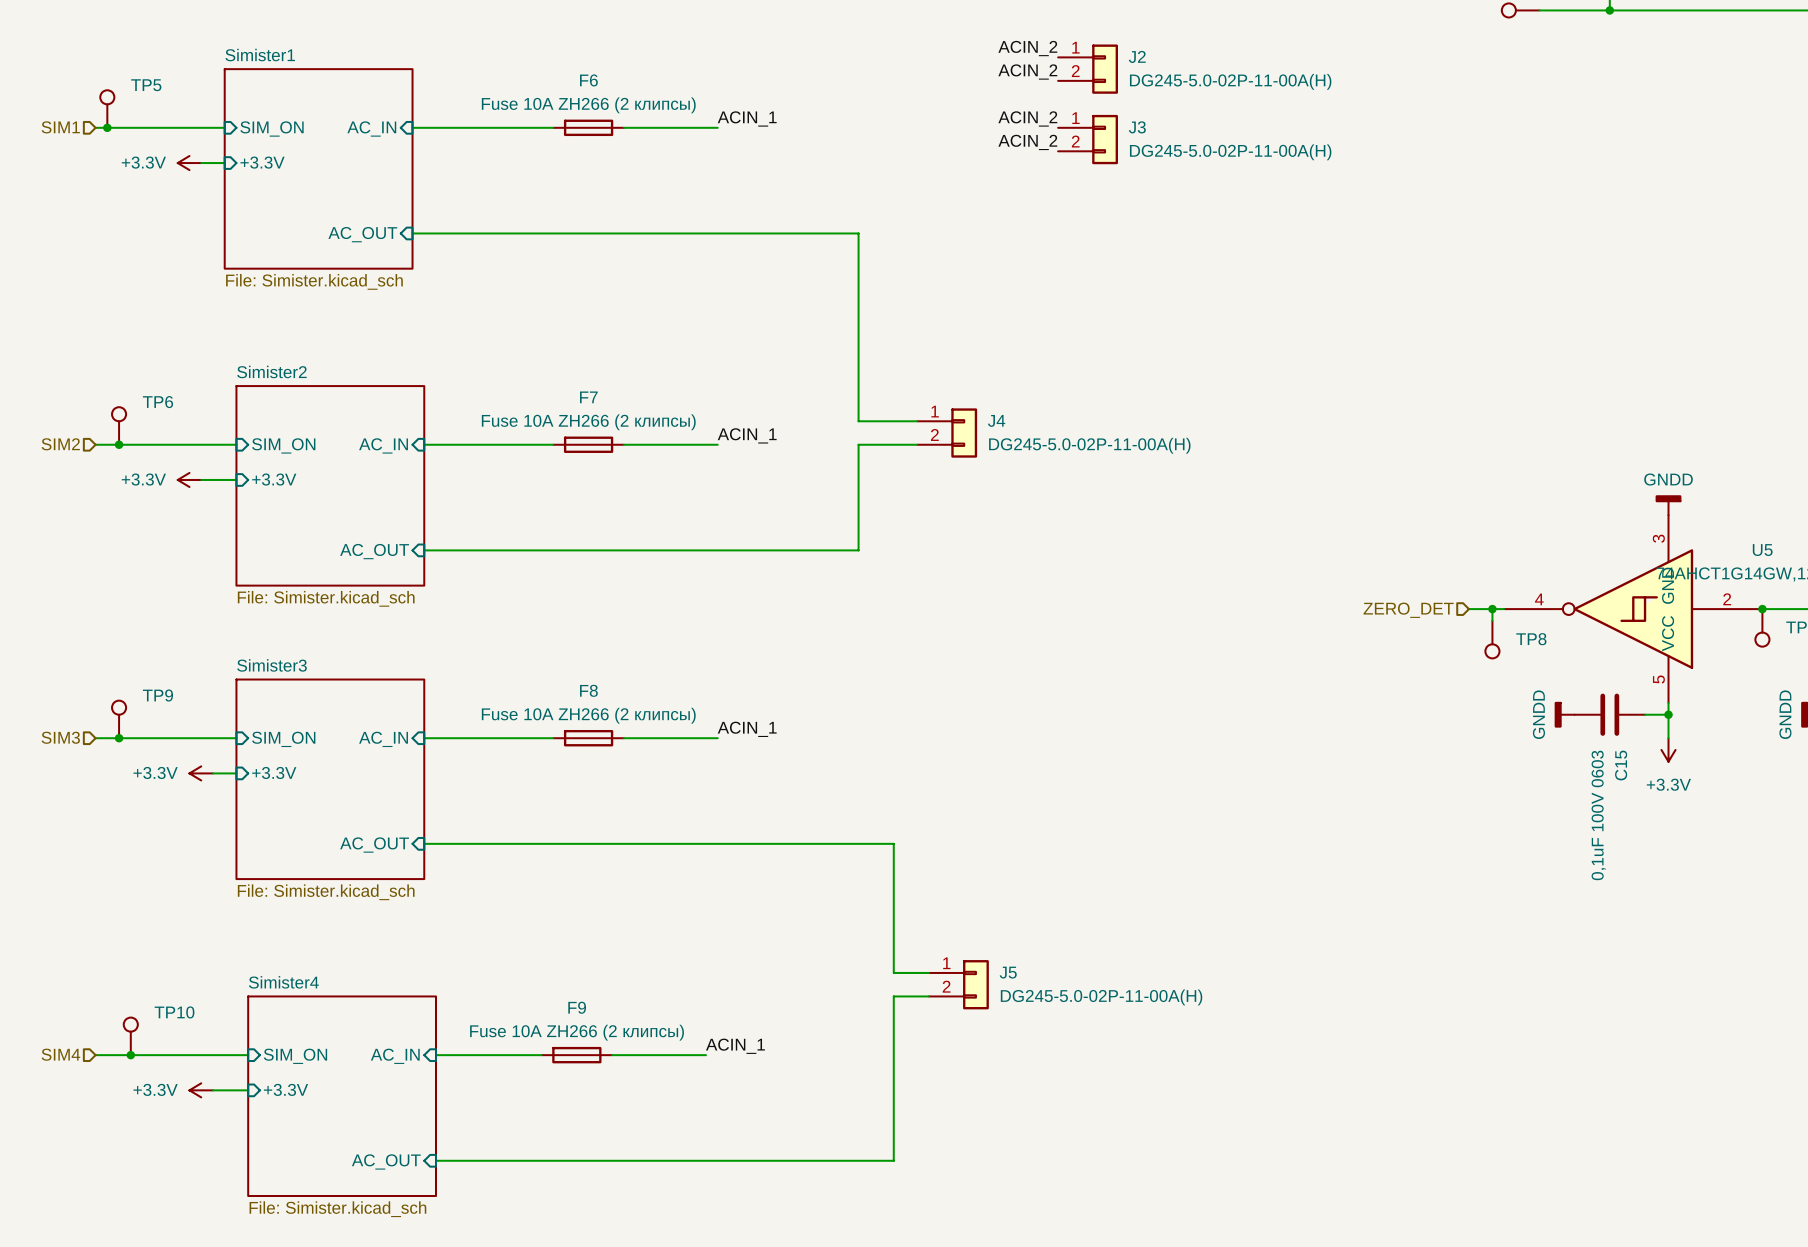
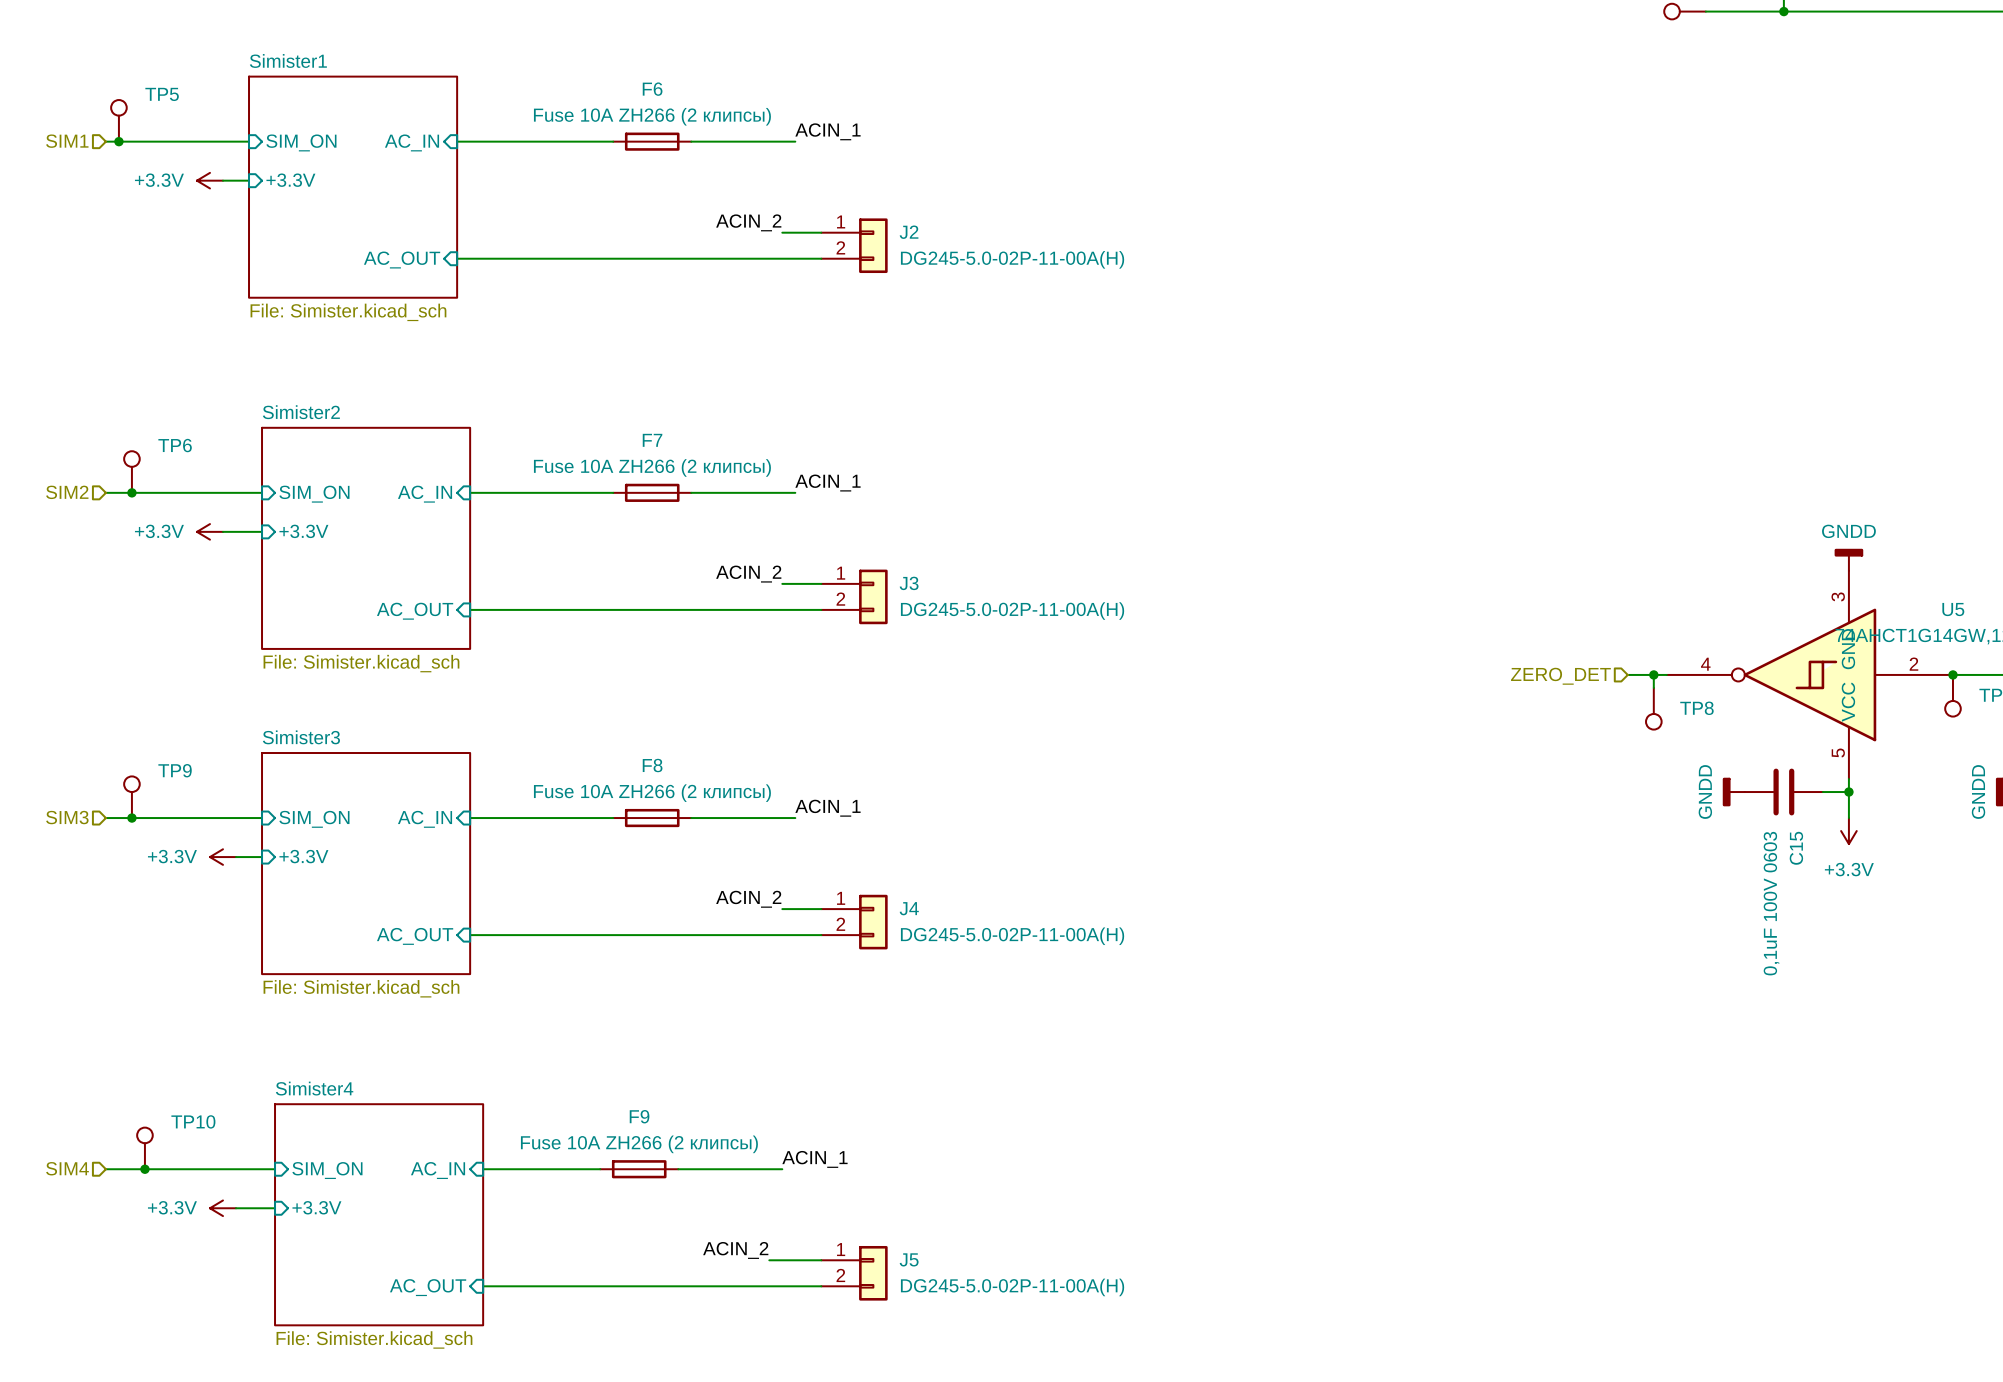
label: ACIN_2 (1027, 48) -> none
J2 position: (1088, 69) -> (854, 245)
label: ACIN_2 (1027, 72) -> none
label: ACIN_2 (1027, 118) -> none
J3 position: (1088, 139) -> (854, 596)
label: ACIN_2 (1027, 142) -> none
label: none -> ACIN_2 (748, 222)
wire: none -> (782, 232) (821, 232)
wire: (741, 233) (858, 233) (858, 421) (917, 421) -> none
J4 position: (947, 433) -> (854, 922)
wire: (917, 444) (858, 444) (858, 550) (741, 550) -> none
label: none -> ACIN_2 (748, 574)
wire: none -> (782, 583) (821, 583)
label: none -> ACIN_2 (748, 899)
wire: none -> (782, 909) (821, 909)
wire: (741, 843) (893, 843) (893, 972) (929, 972) -> none
J5 position: (958, 984) -> (854, 1273)
wire: (929, 996) (893, 996) (893, 1160) (741, 1160) -> none
label: none -> ACIN_2 (735, 1250)
wire: none -> (769, 1260) (821, 1260)

